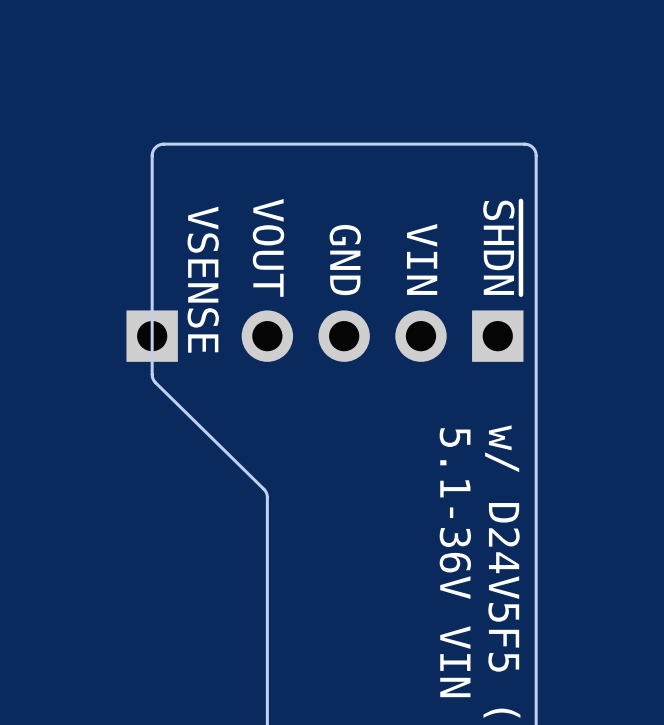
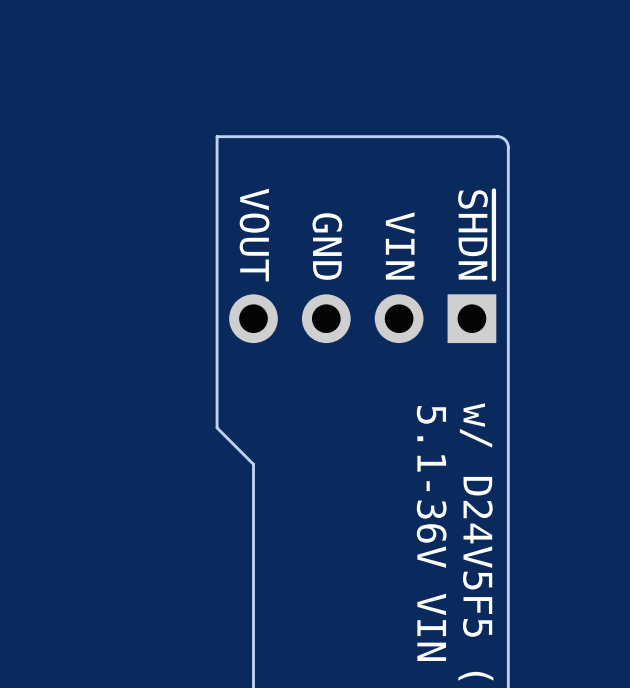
board edge: (228, 144) (162, 144) (156, 146) (152, 151) (152, 376) (155, 382) (264, 489) (267, 497) -> (217, 136) (217, 427) (253, 464) (253, 471)
text: VSENSE (203, 279) -> none
part: (152, 336) -> none

